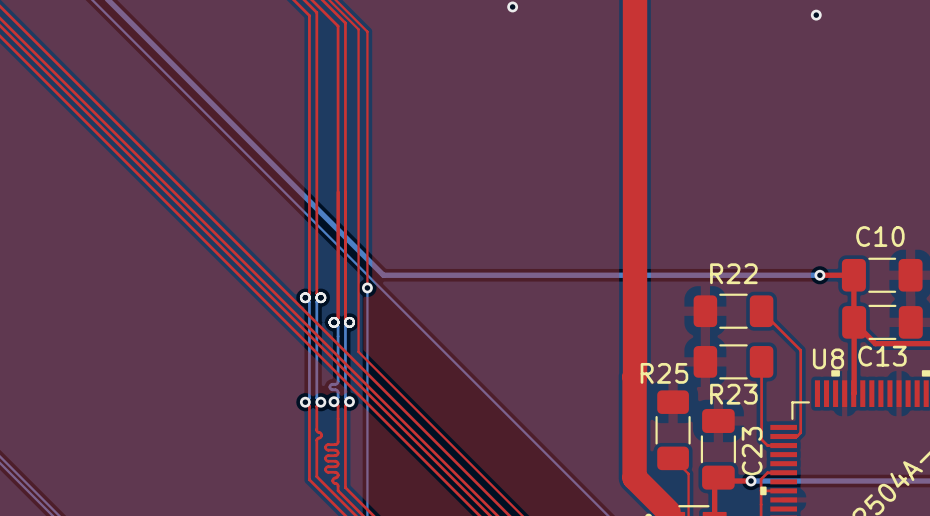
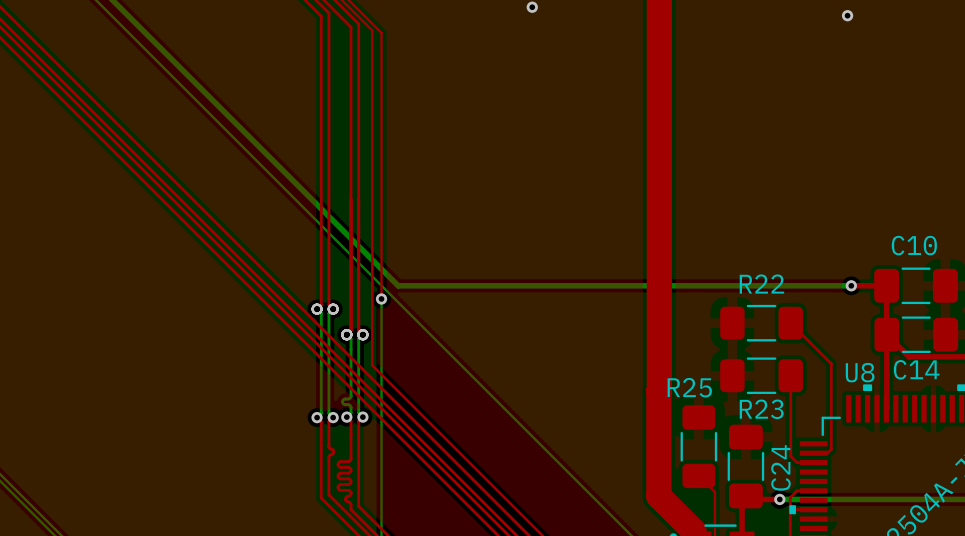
C13 name: C13 (882, 356) -> C14 (916, 369)
C23 name: C23 (752, 451) -> C24 (780, 467)

